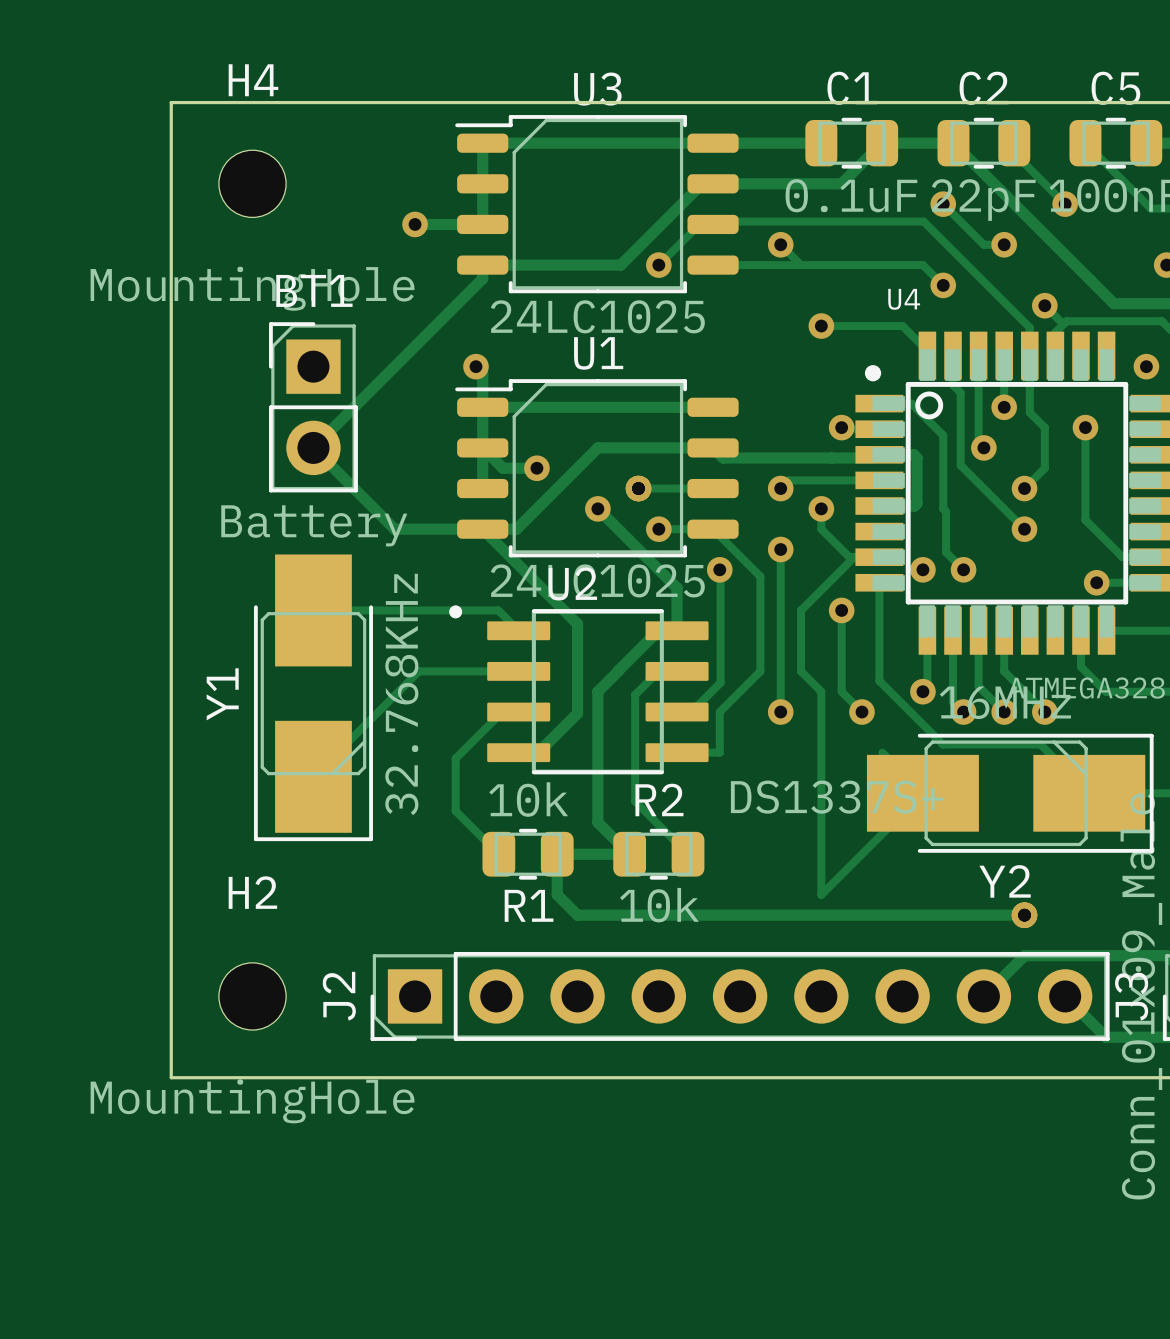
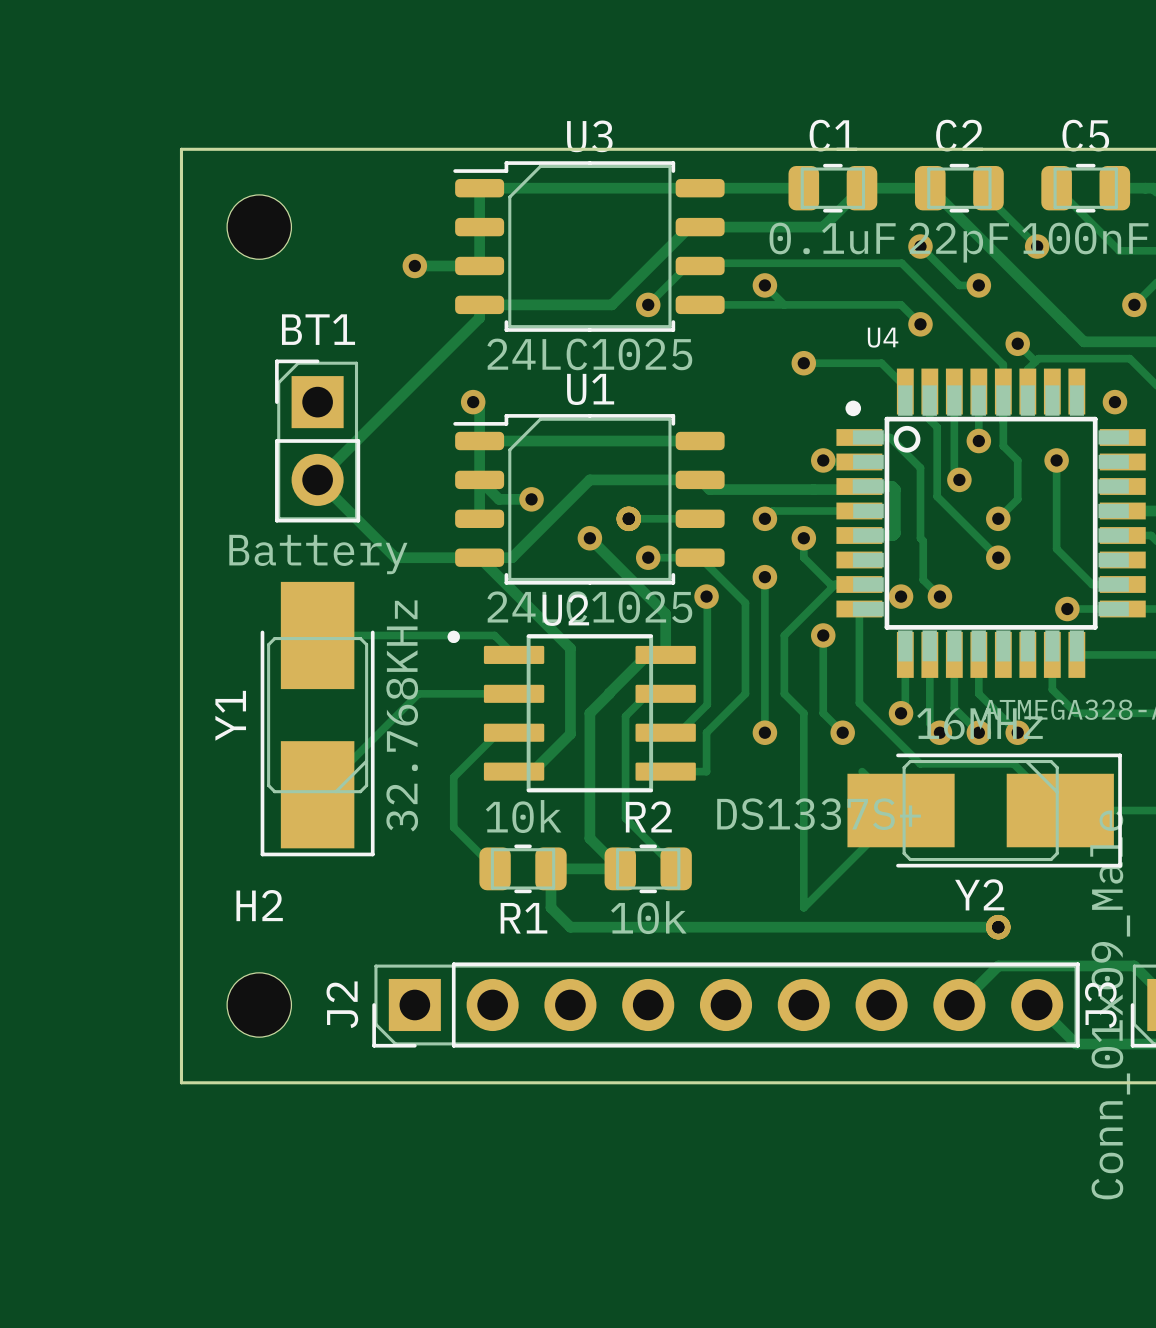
H4 name: H4 (253, 80) -> none
H4 value: MountingHole (252, 288) -> none
H2 value: MountingHole (252, 1101) -> none

